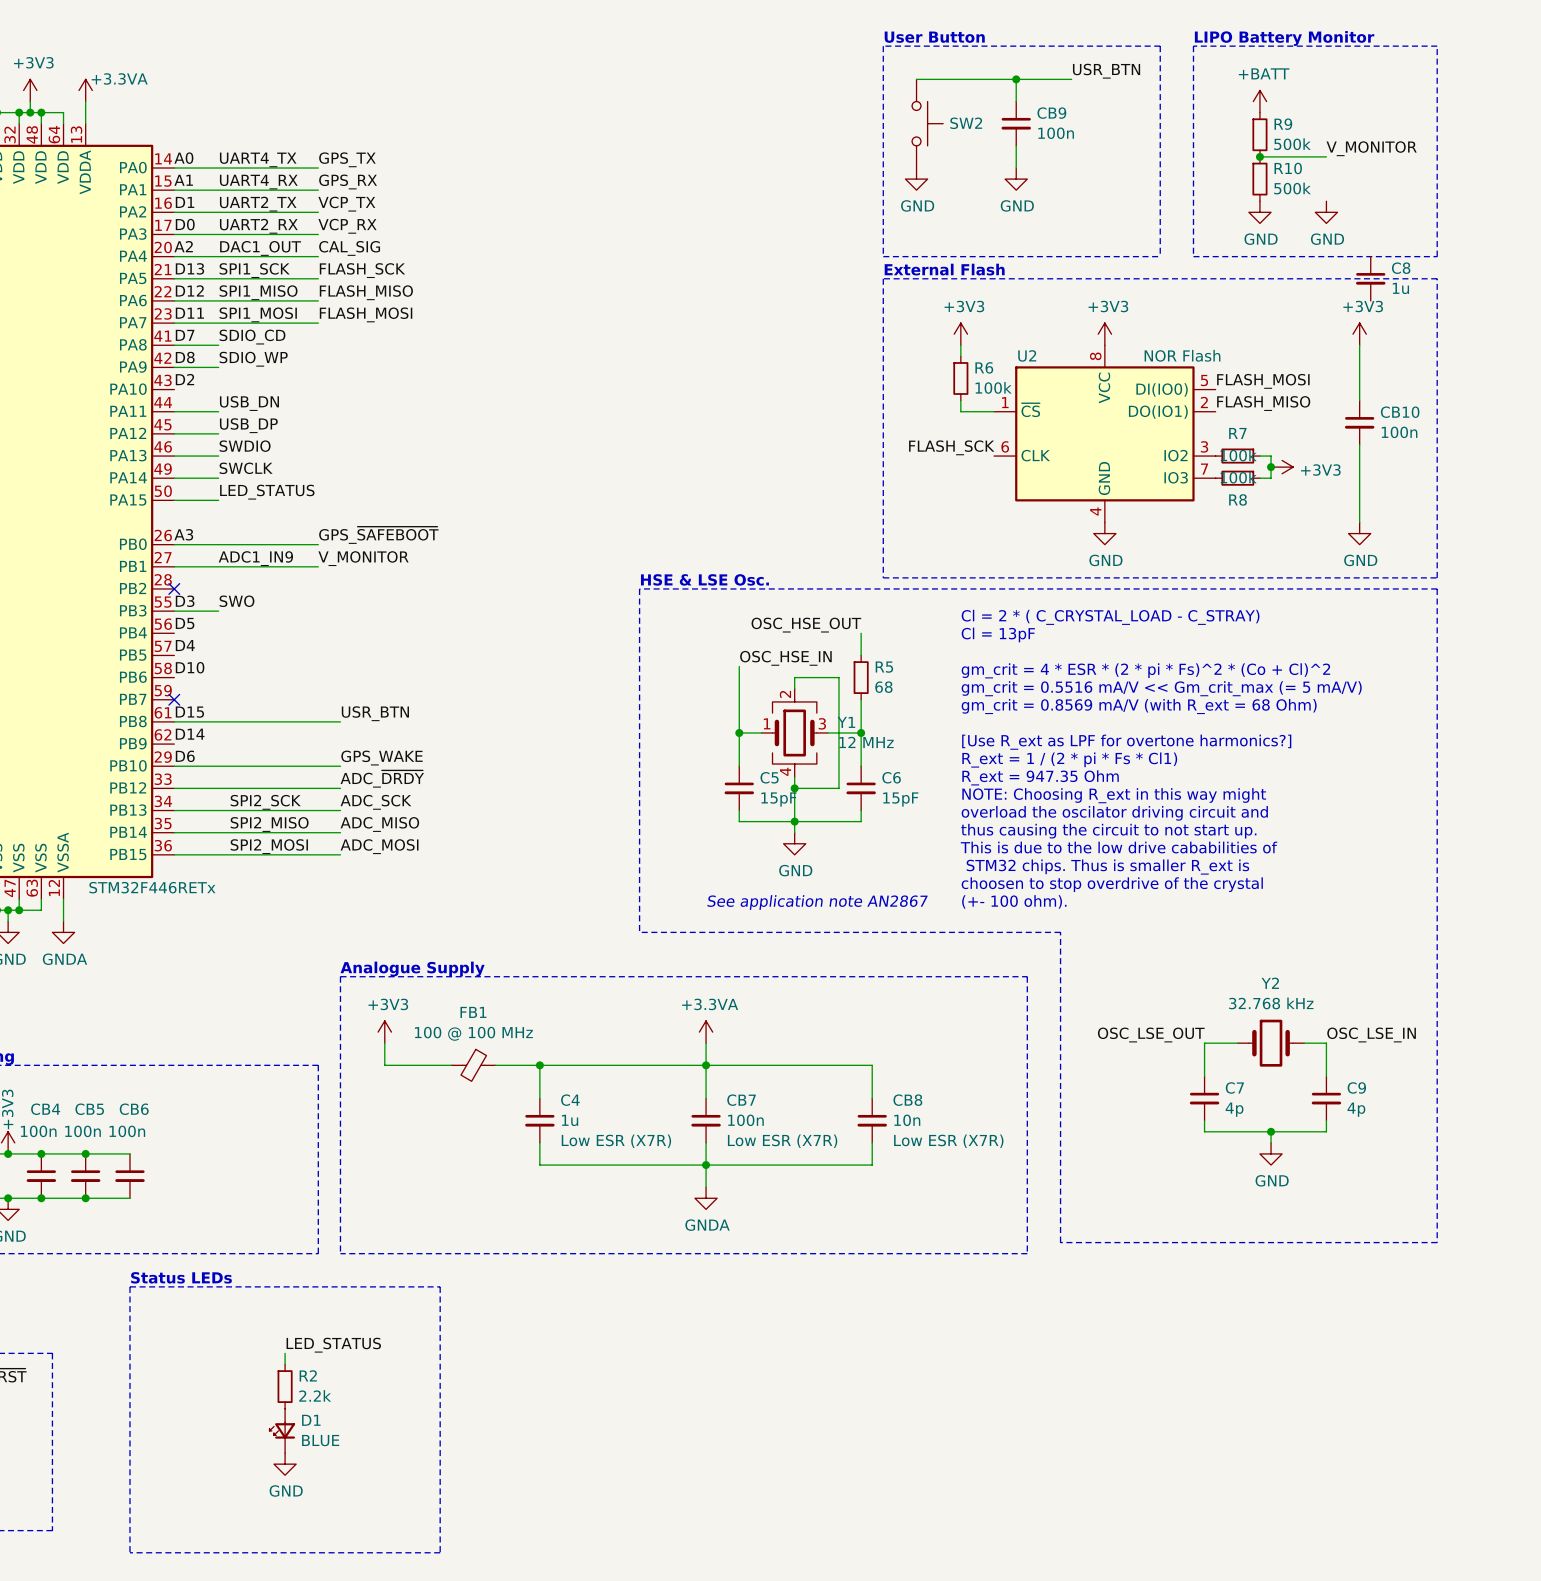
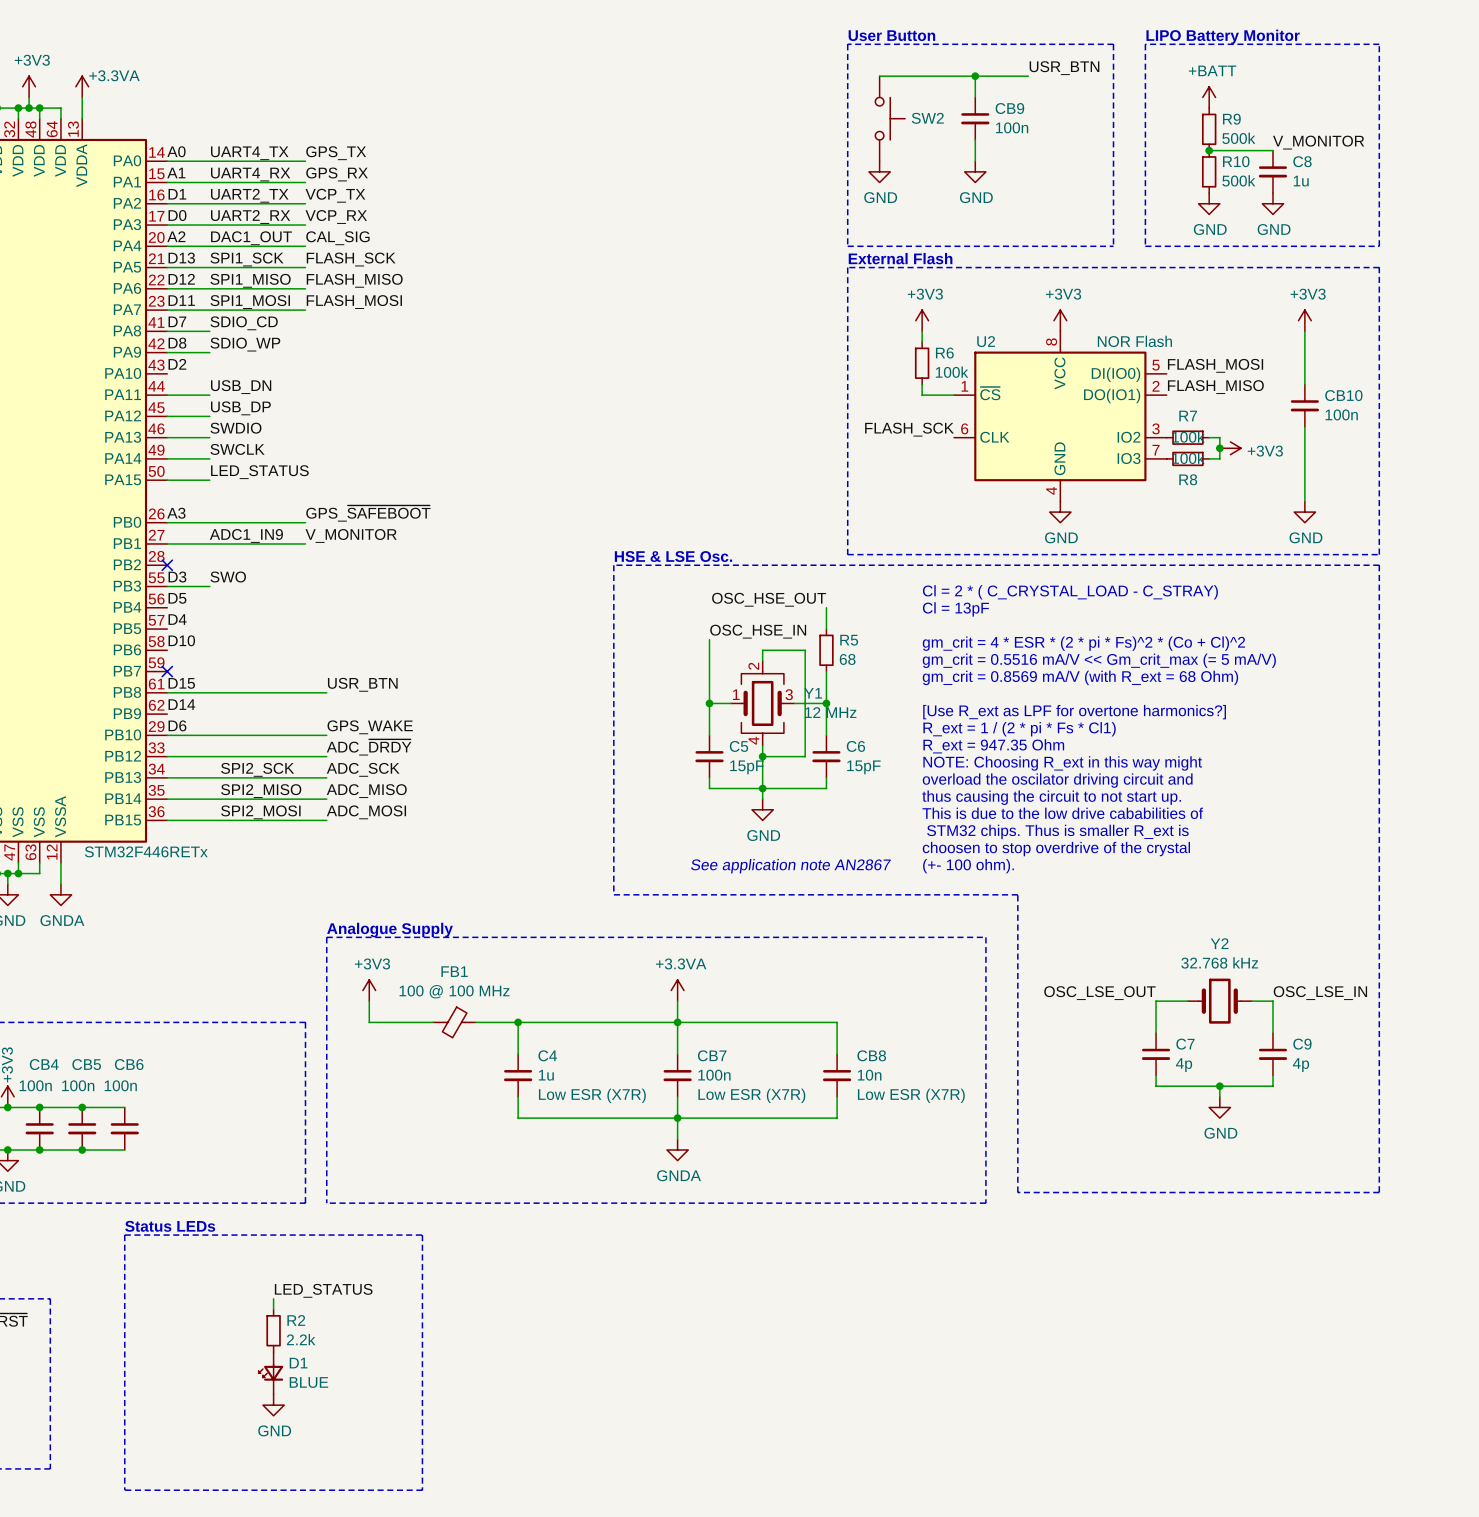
C8 position: (1370, 278) -> (1272, 171)

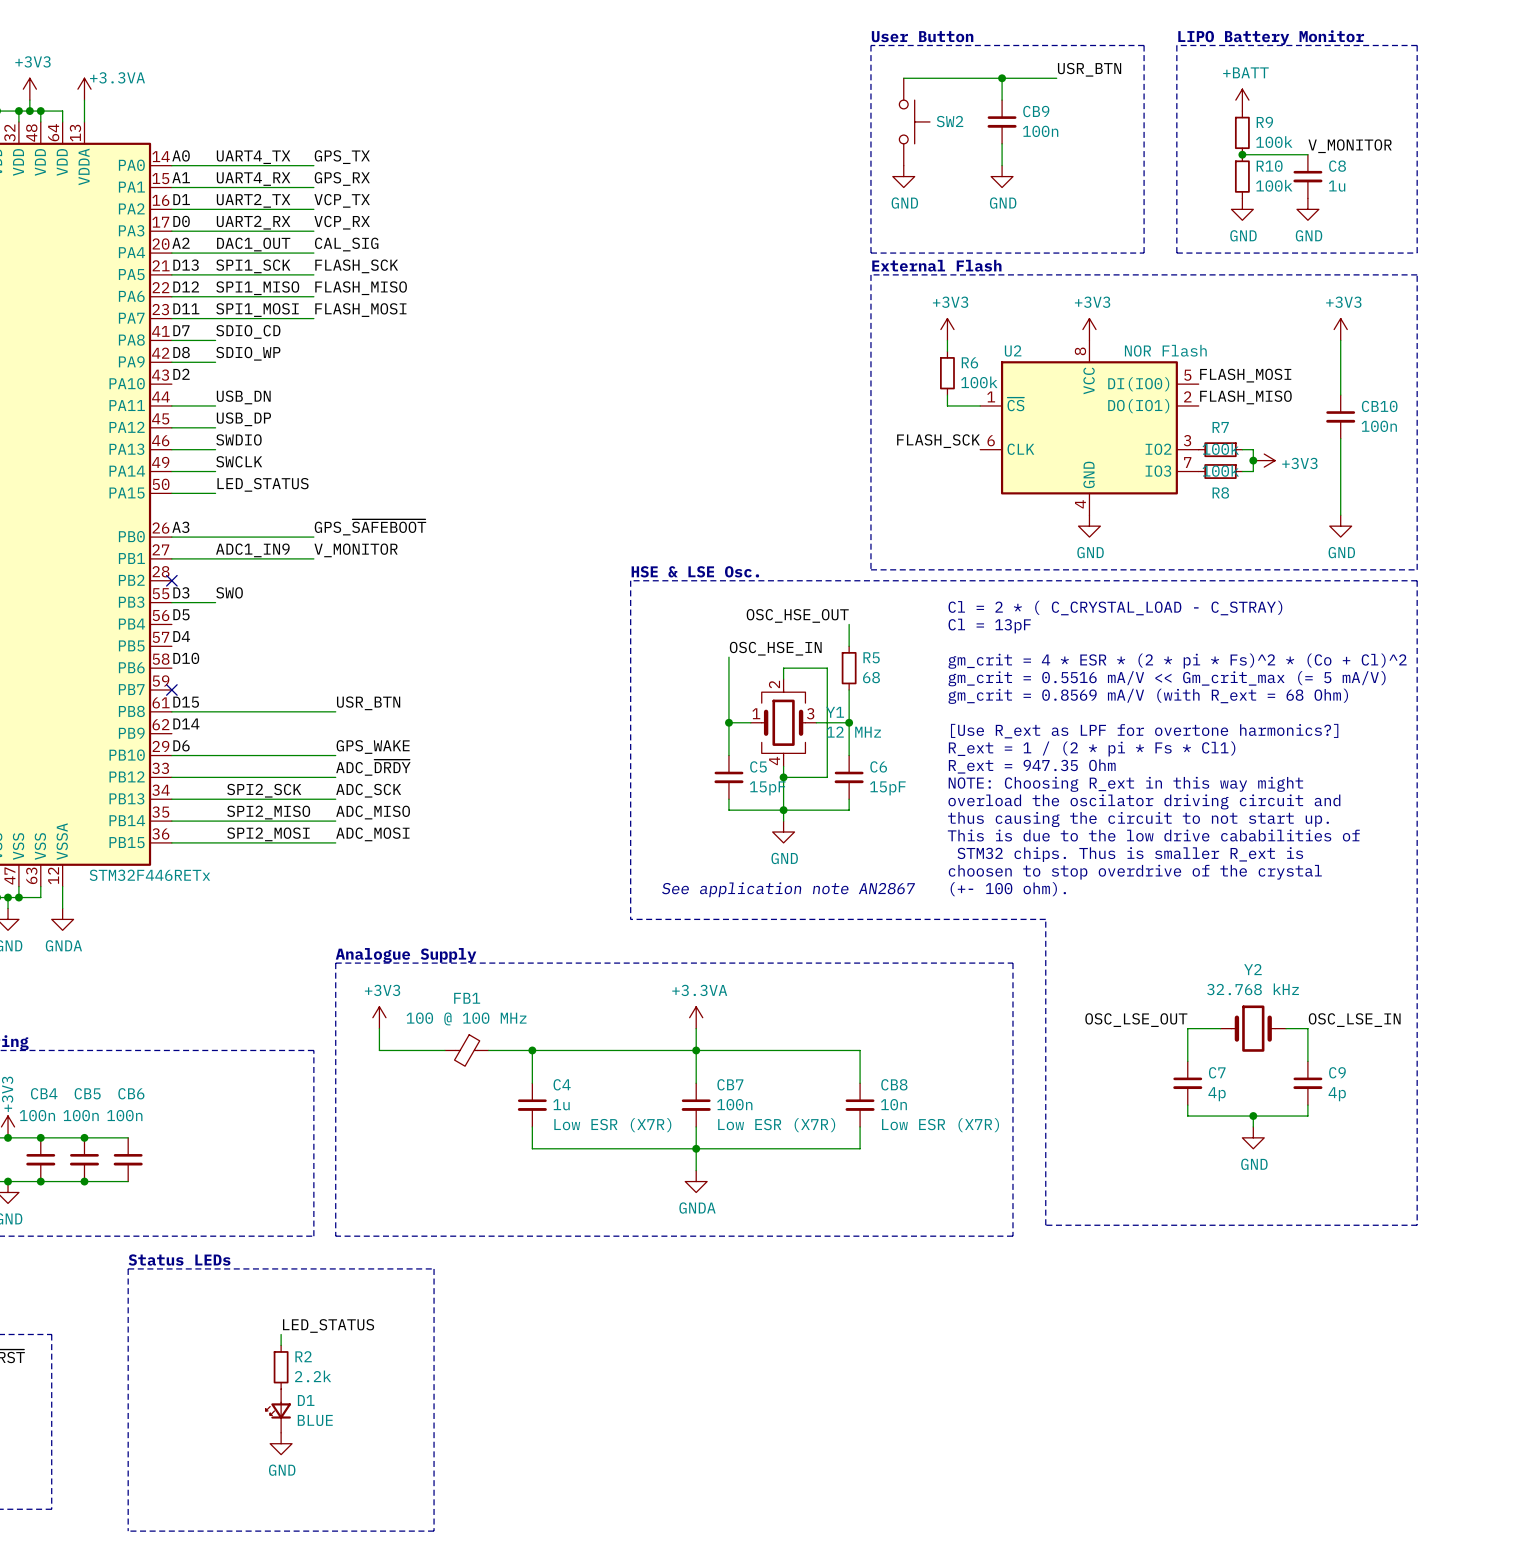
R9 value: 500k (1238, 138) -> 100k (1274, 142)
R10 value: 500k (1238, 180) -> 100k (1274, 185)

